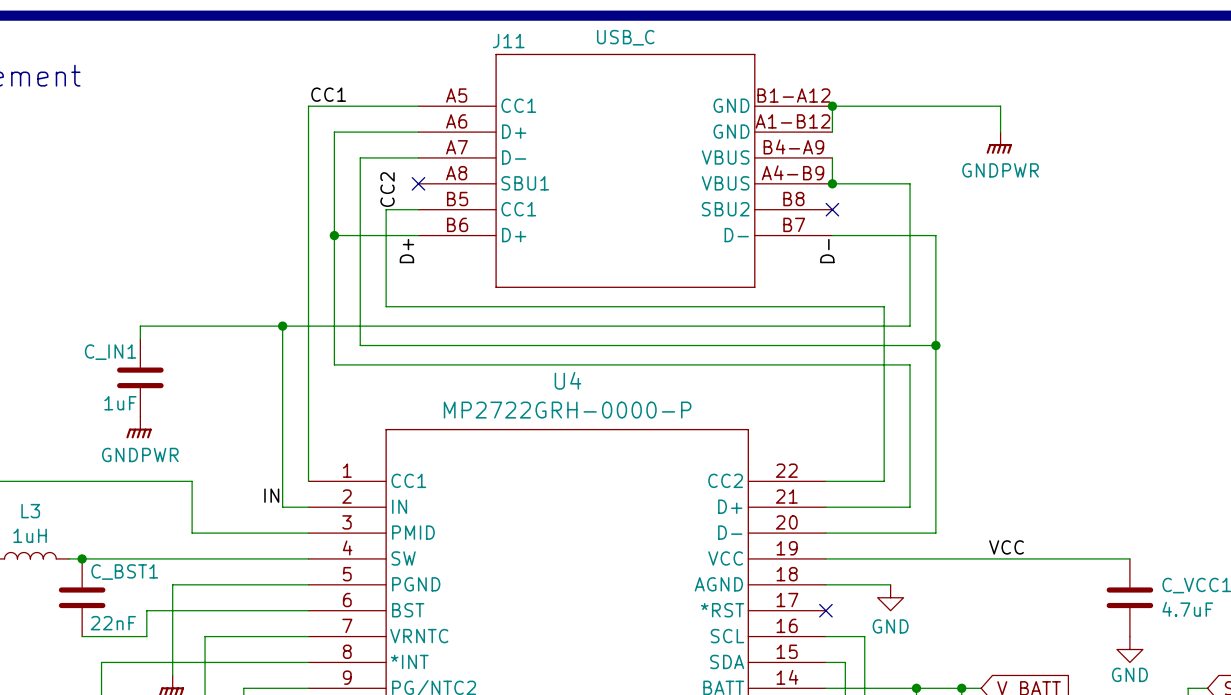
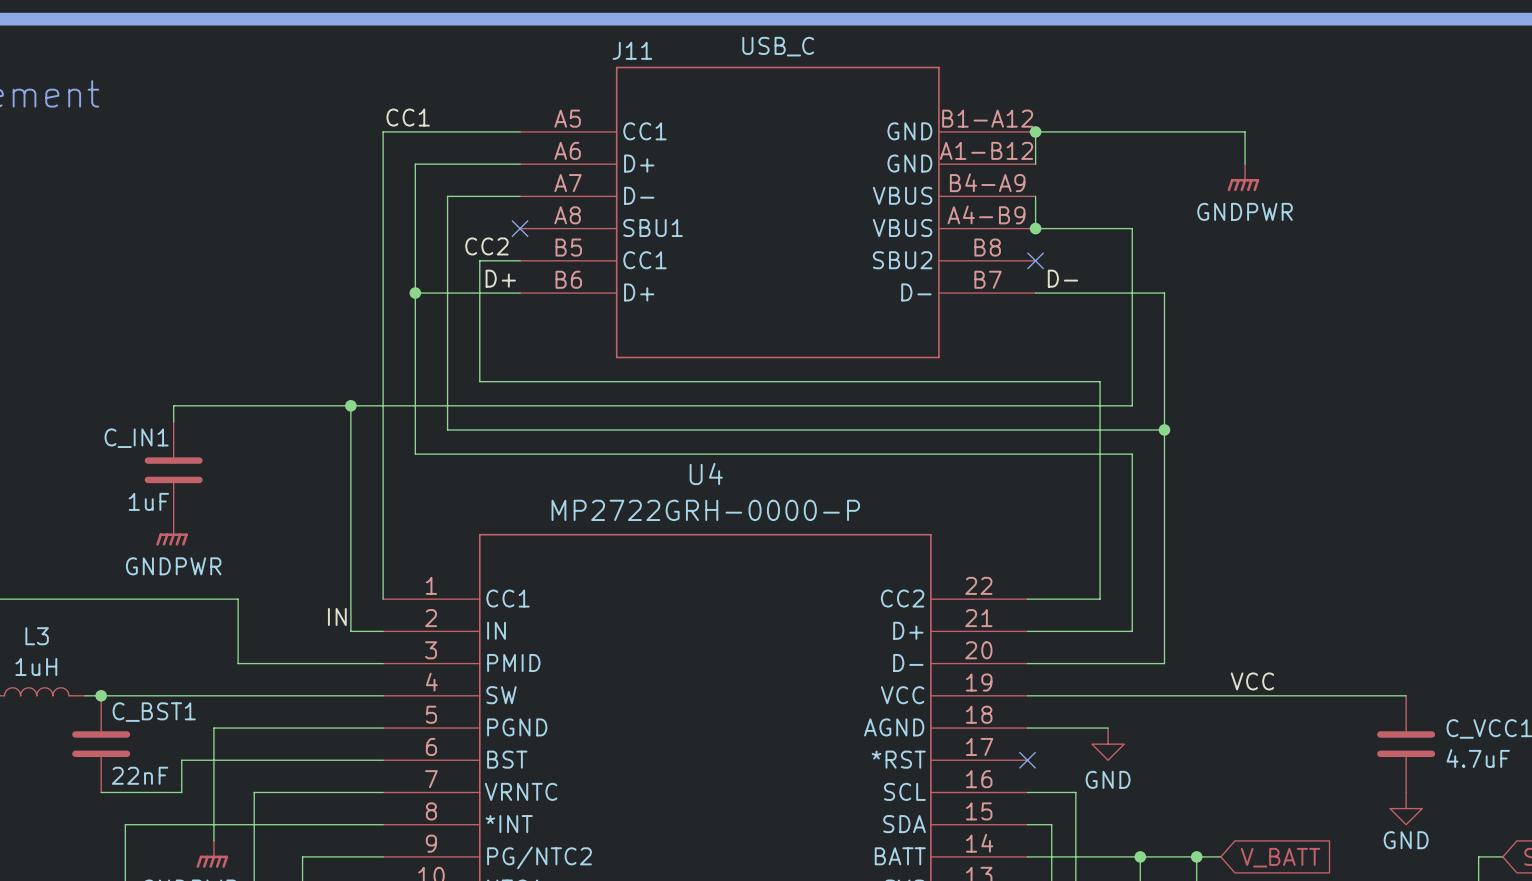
label rotation: 0° (387, 189) -> 90° clockwise (486, 246)
label rotation: 0° (406, 251) -> 90° clockwise (500, 278)
label rotation: 0° (827, 251) -> 90° clockwise (1062, 278)
label position: D- (827, 251) -> D- (1062, 278)

